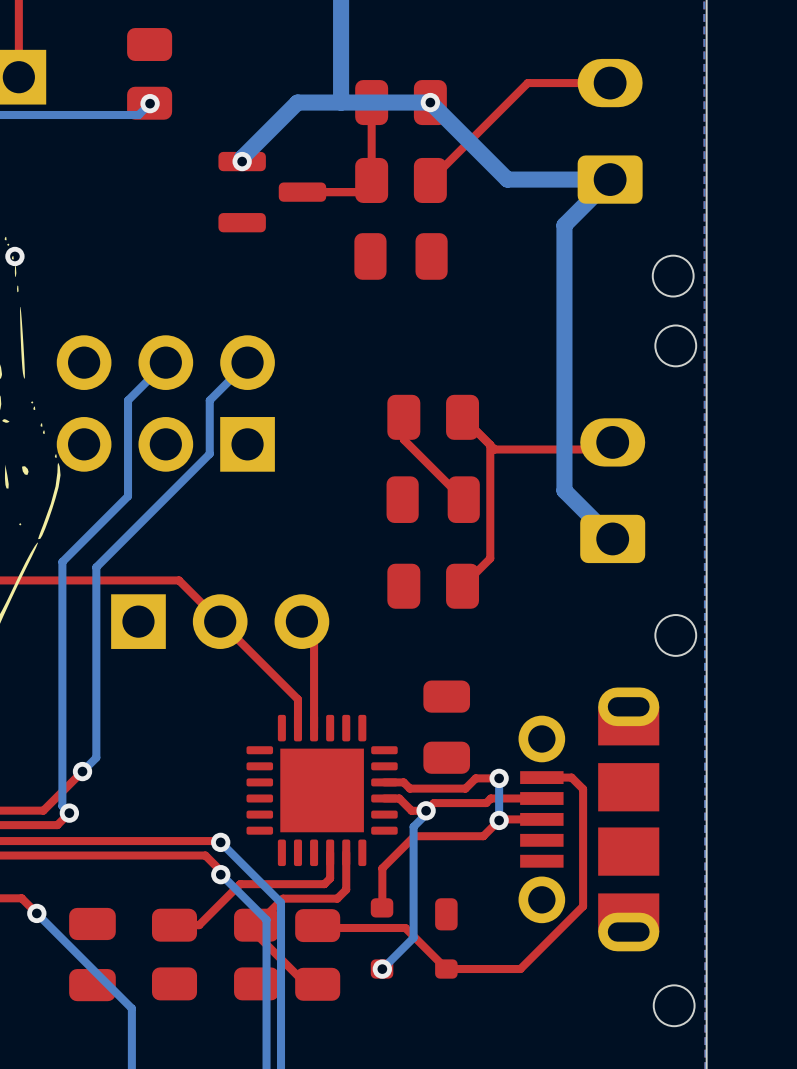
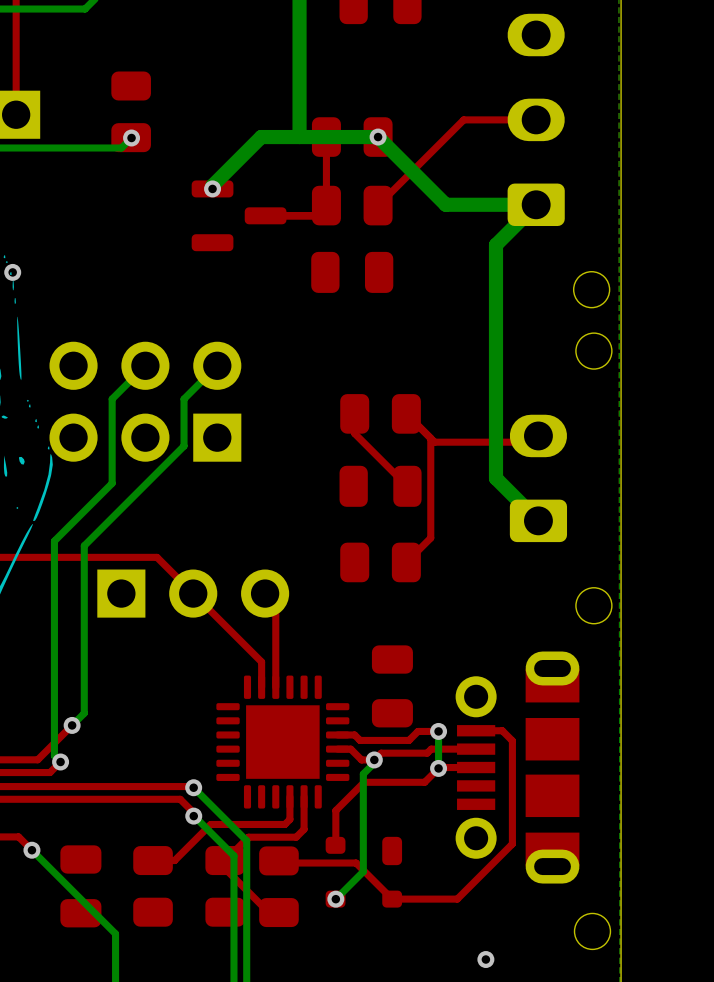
via: none -> (485, 959)

